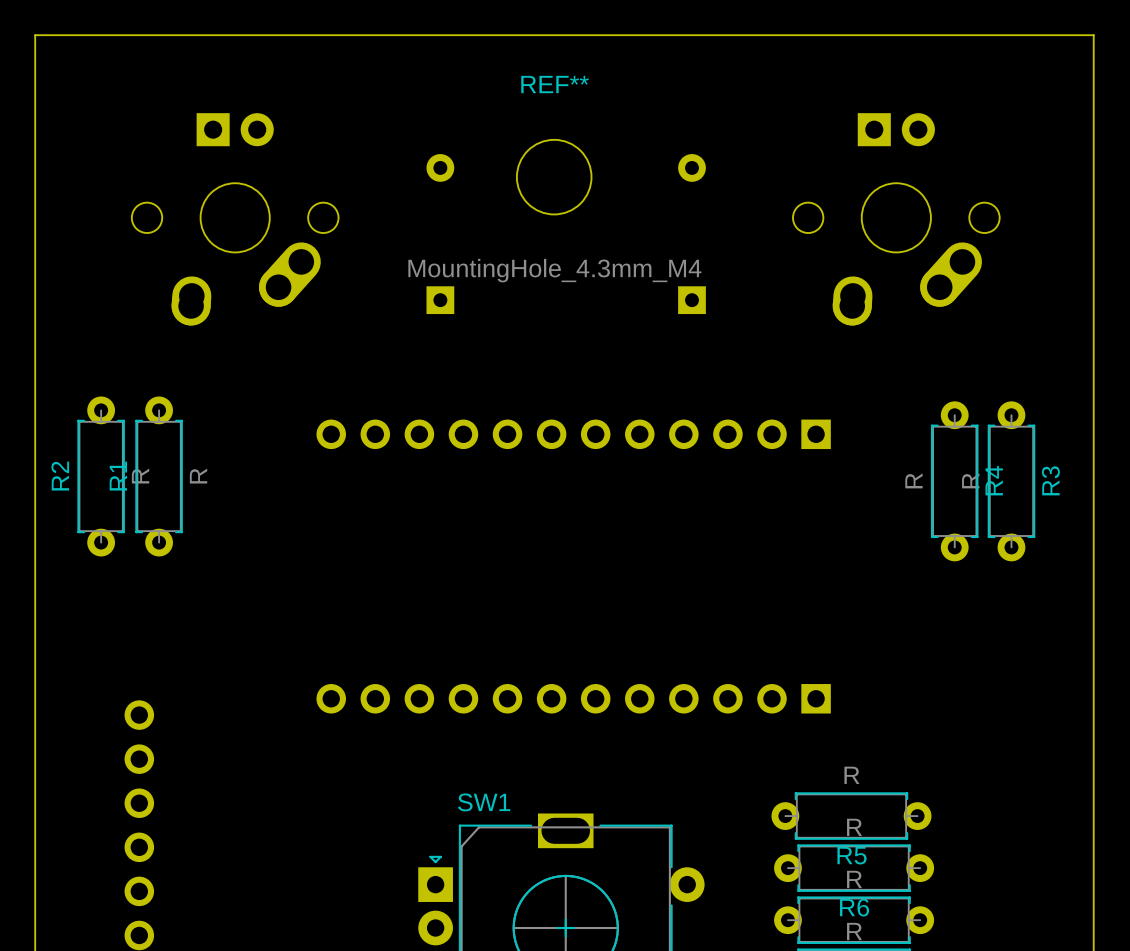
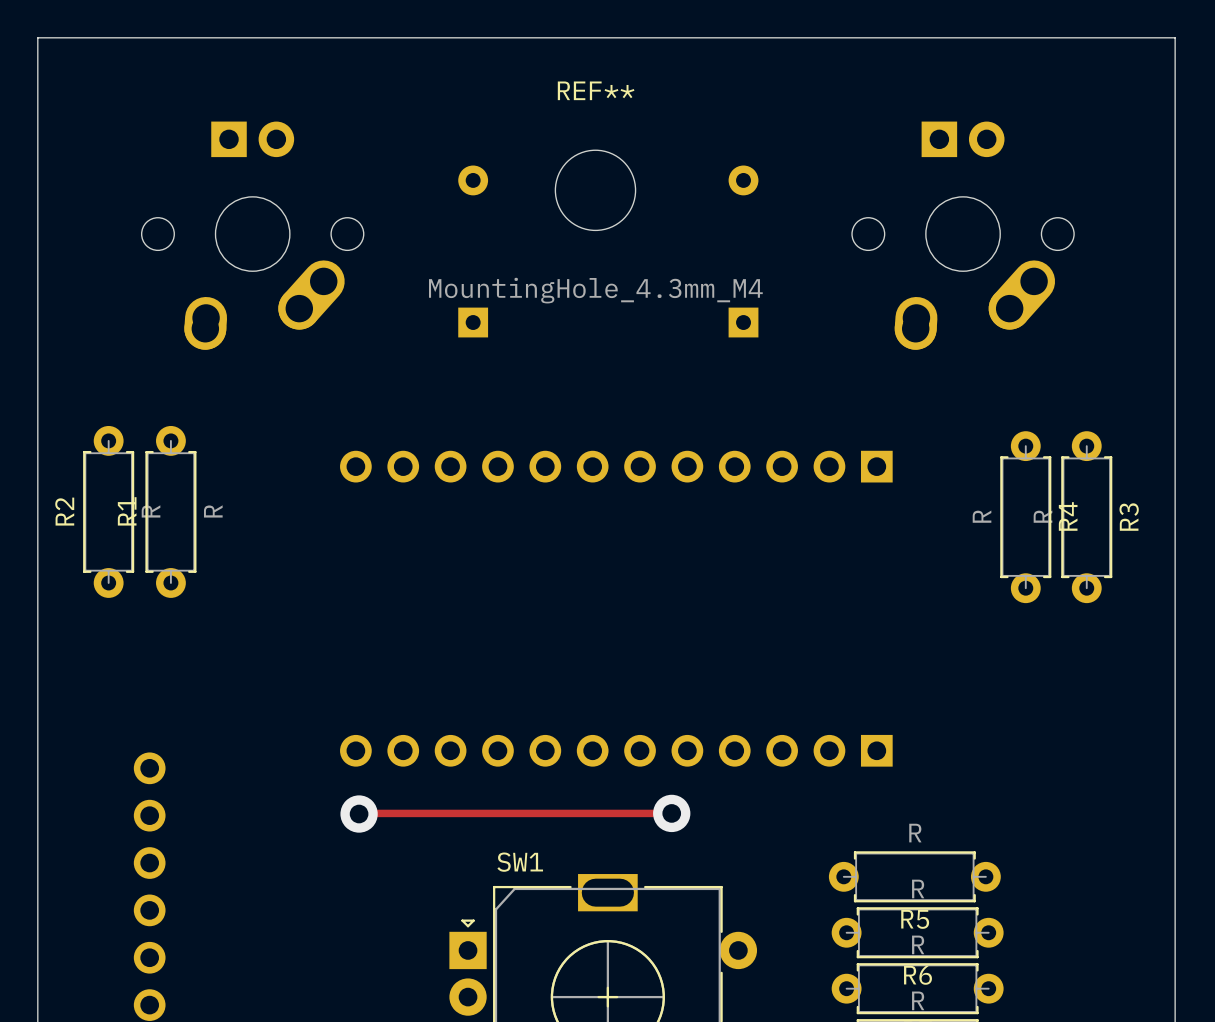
via: none -> (359, 814)
track: none -> (671, 813) (359, 814)
via: none -> (671, 813)

